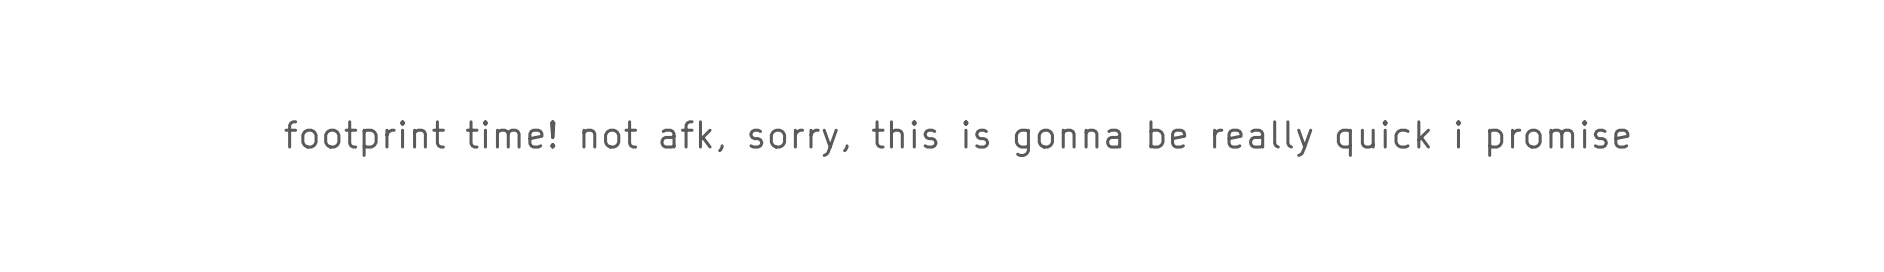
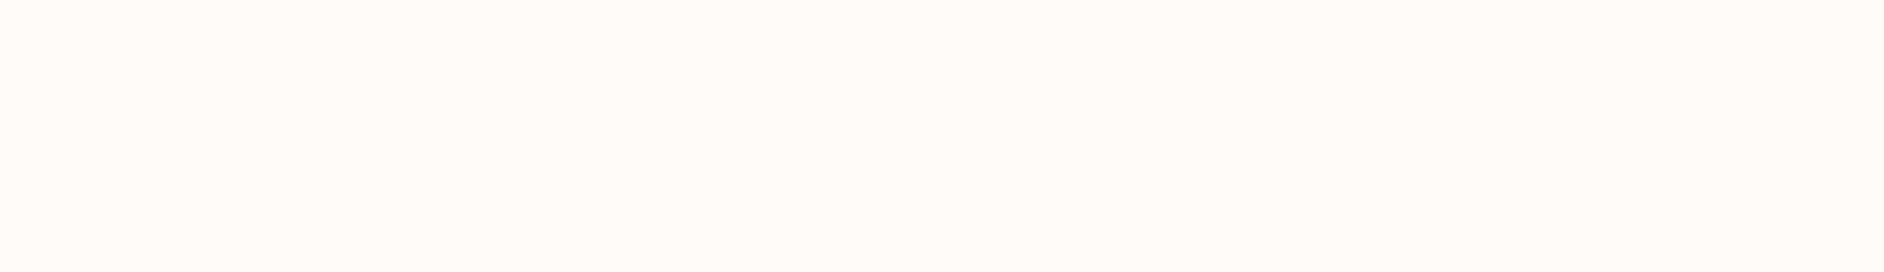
text: footprint time! not afk, sorry, this is gonna be really quick i promise (956, 138) -> none

